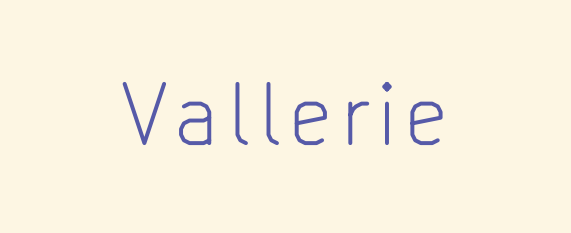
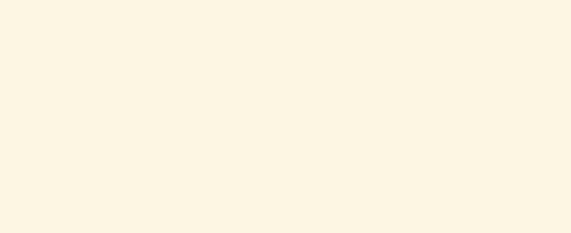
text: Vallerie (282, 113) -> none

